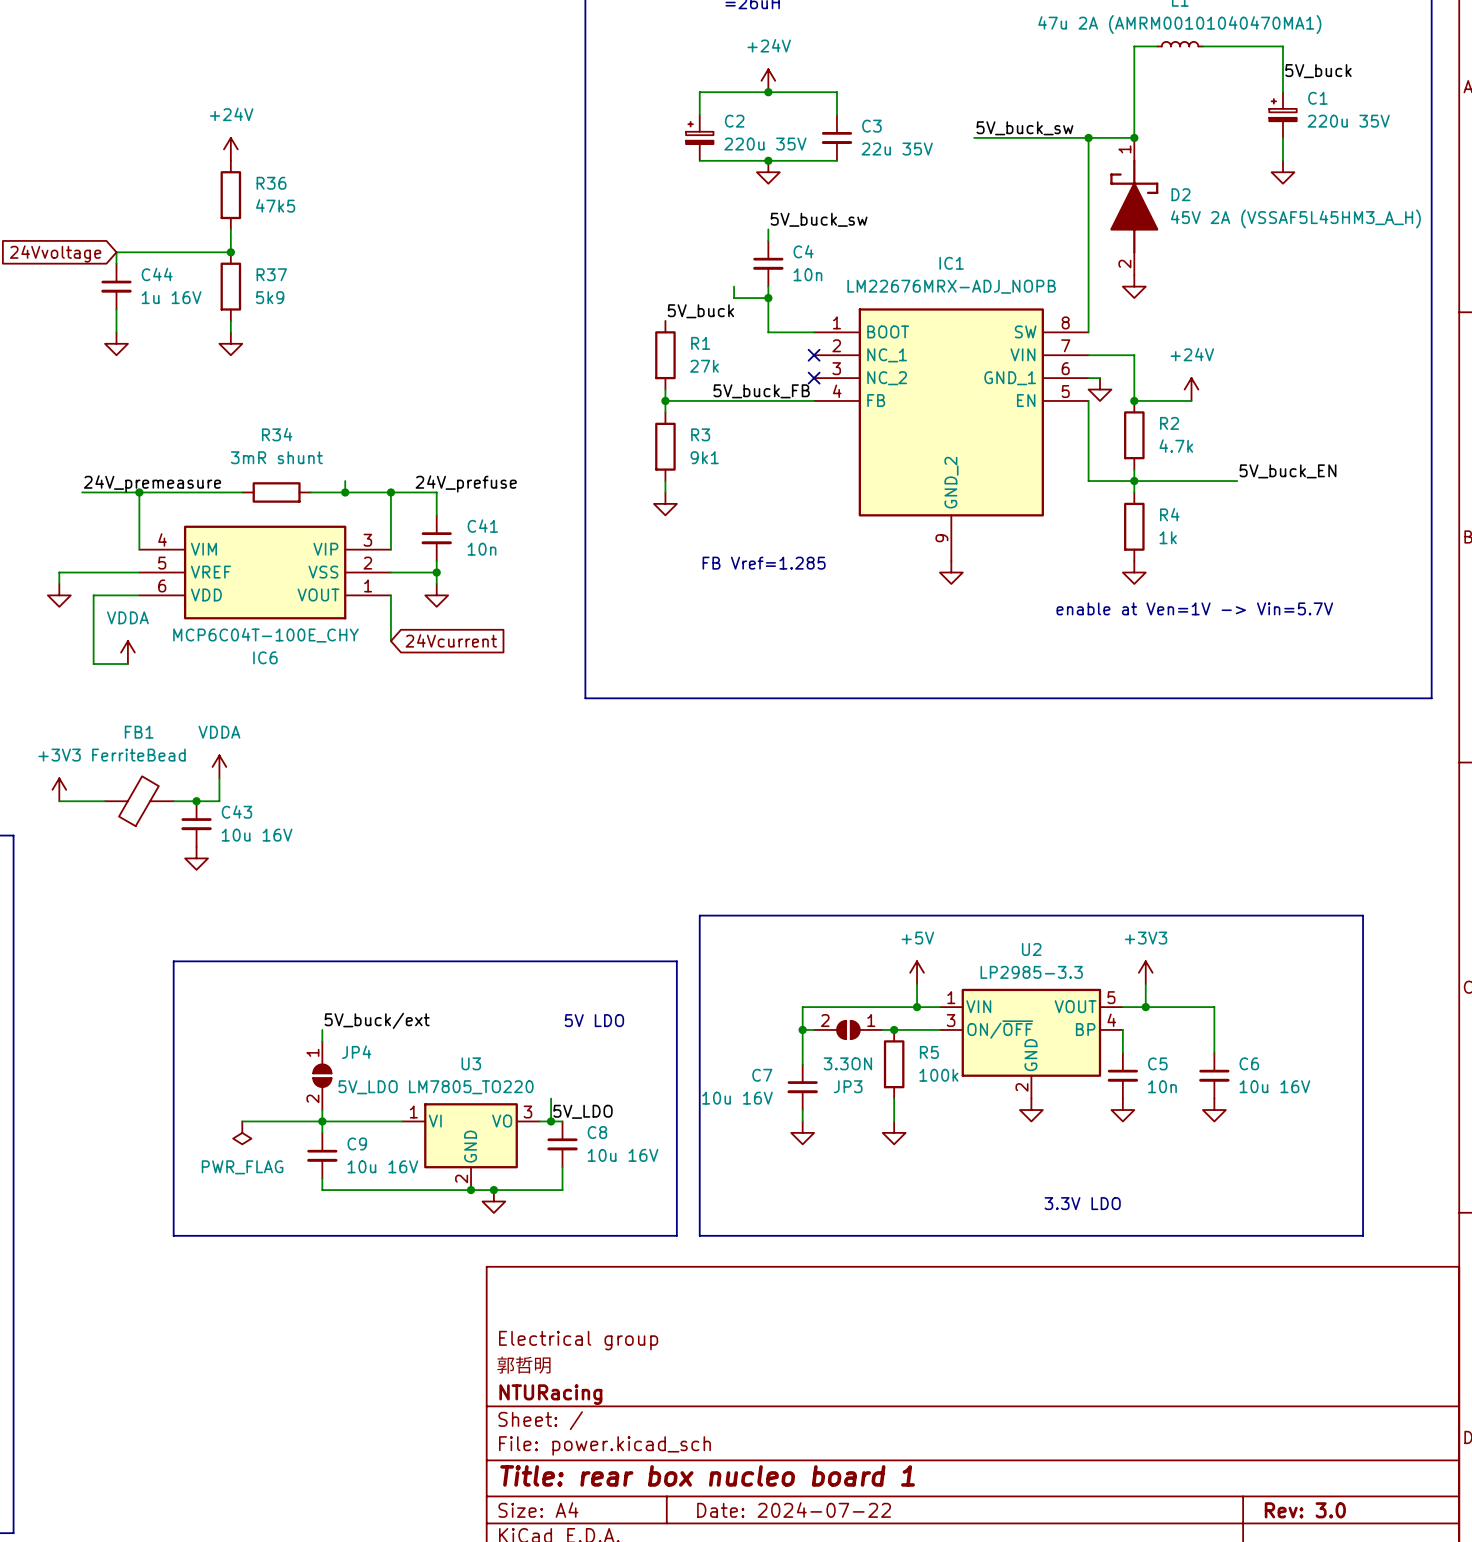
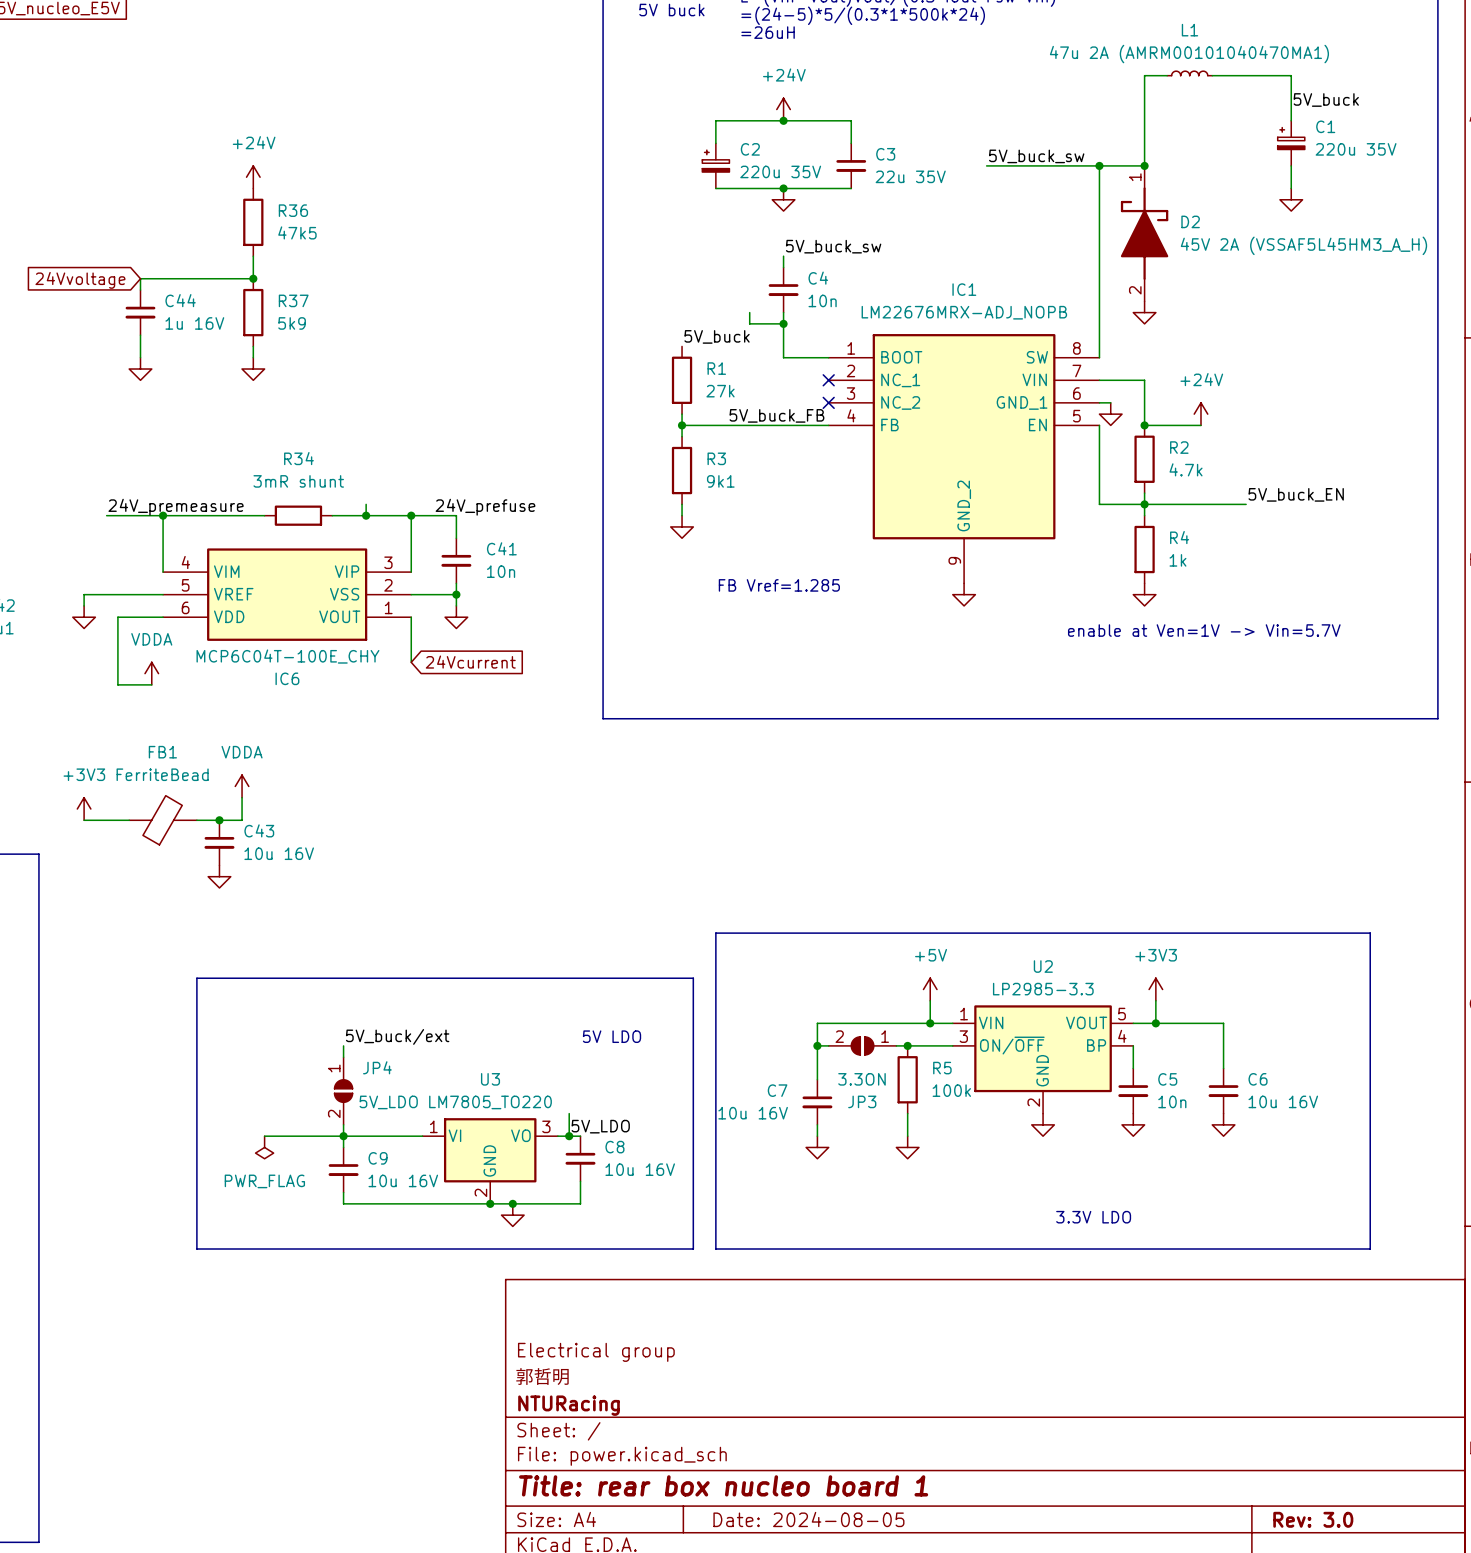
title block: Date: 2024-07-22 (794, 1510) -> Date: 2024-08-05 (808, 1519)

